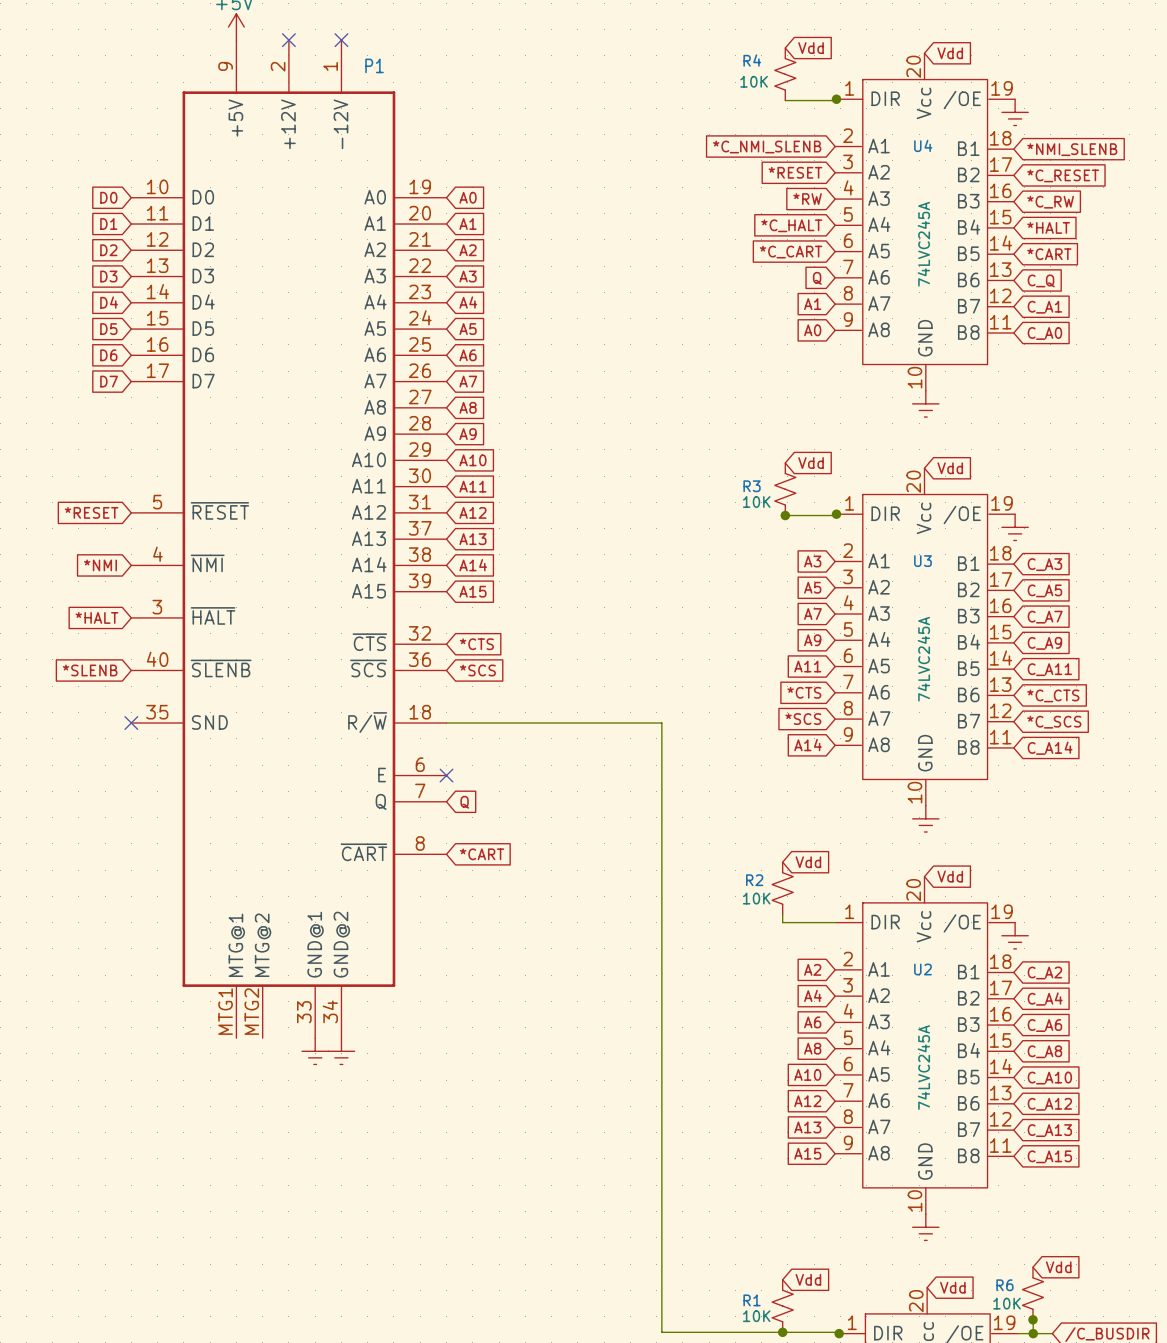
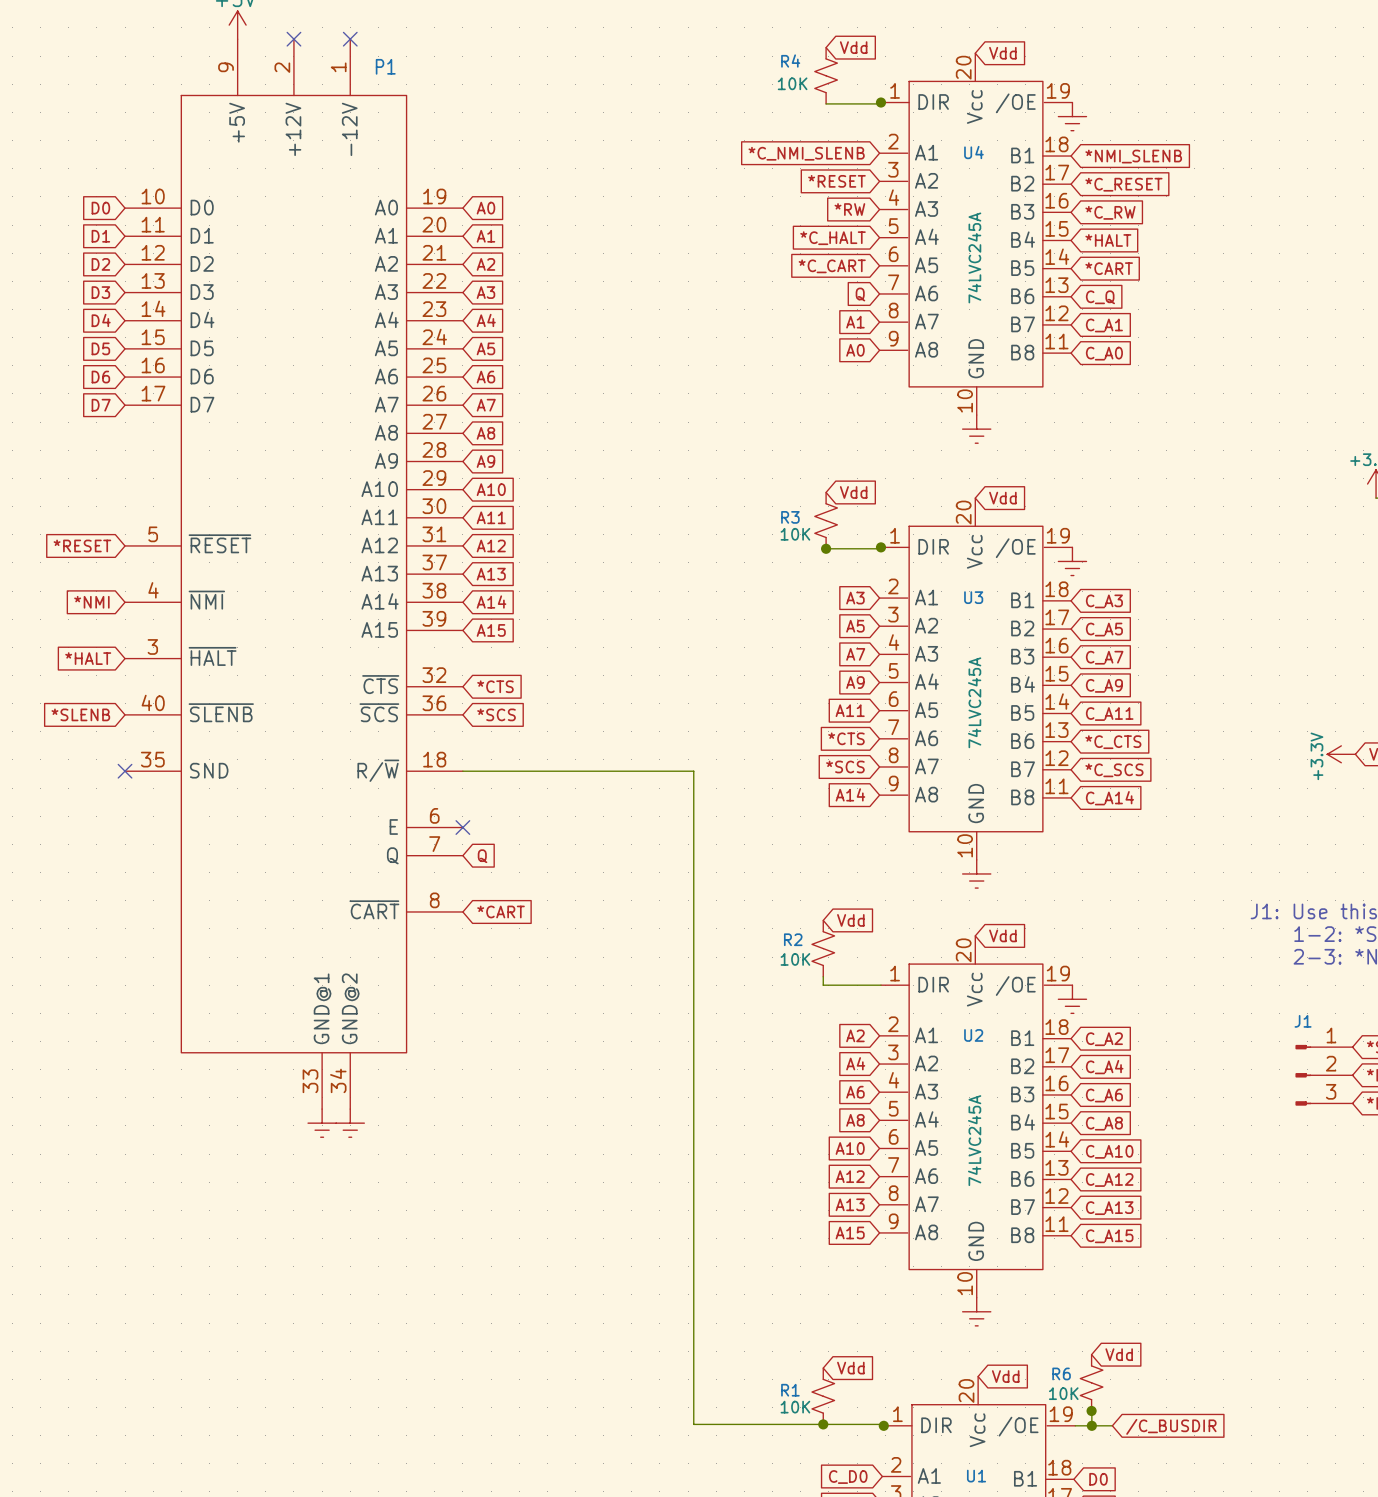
P1 symbol: [131, 40, 447, 1039] -> [125, 39, 463, 1110]

